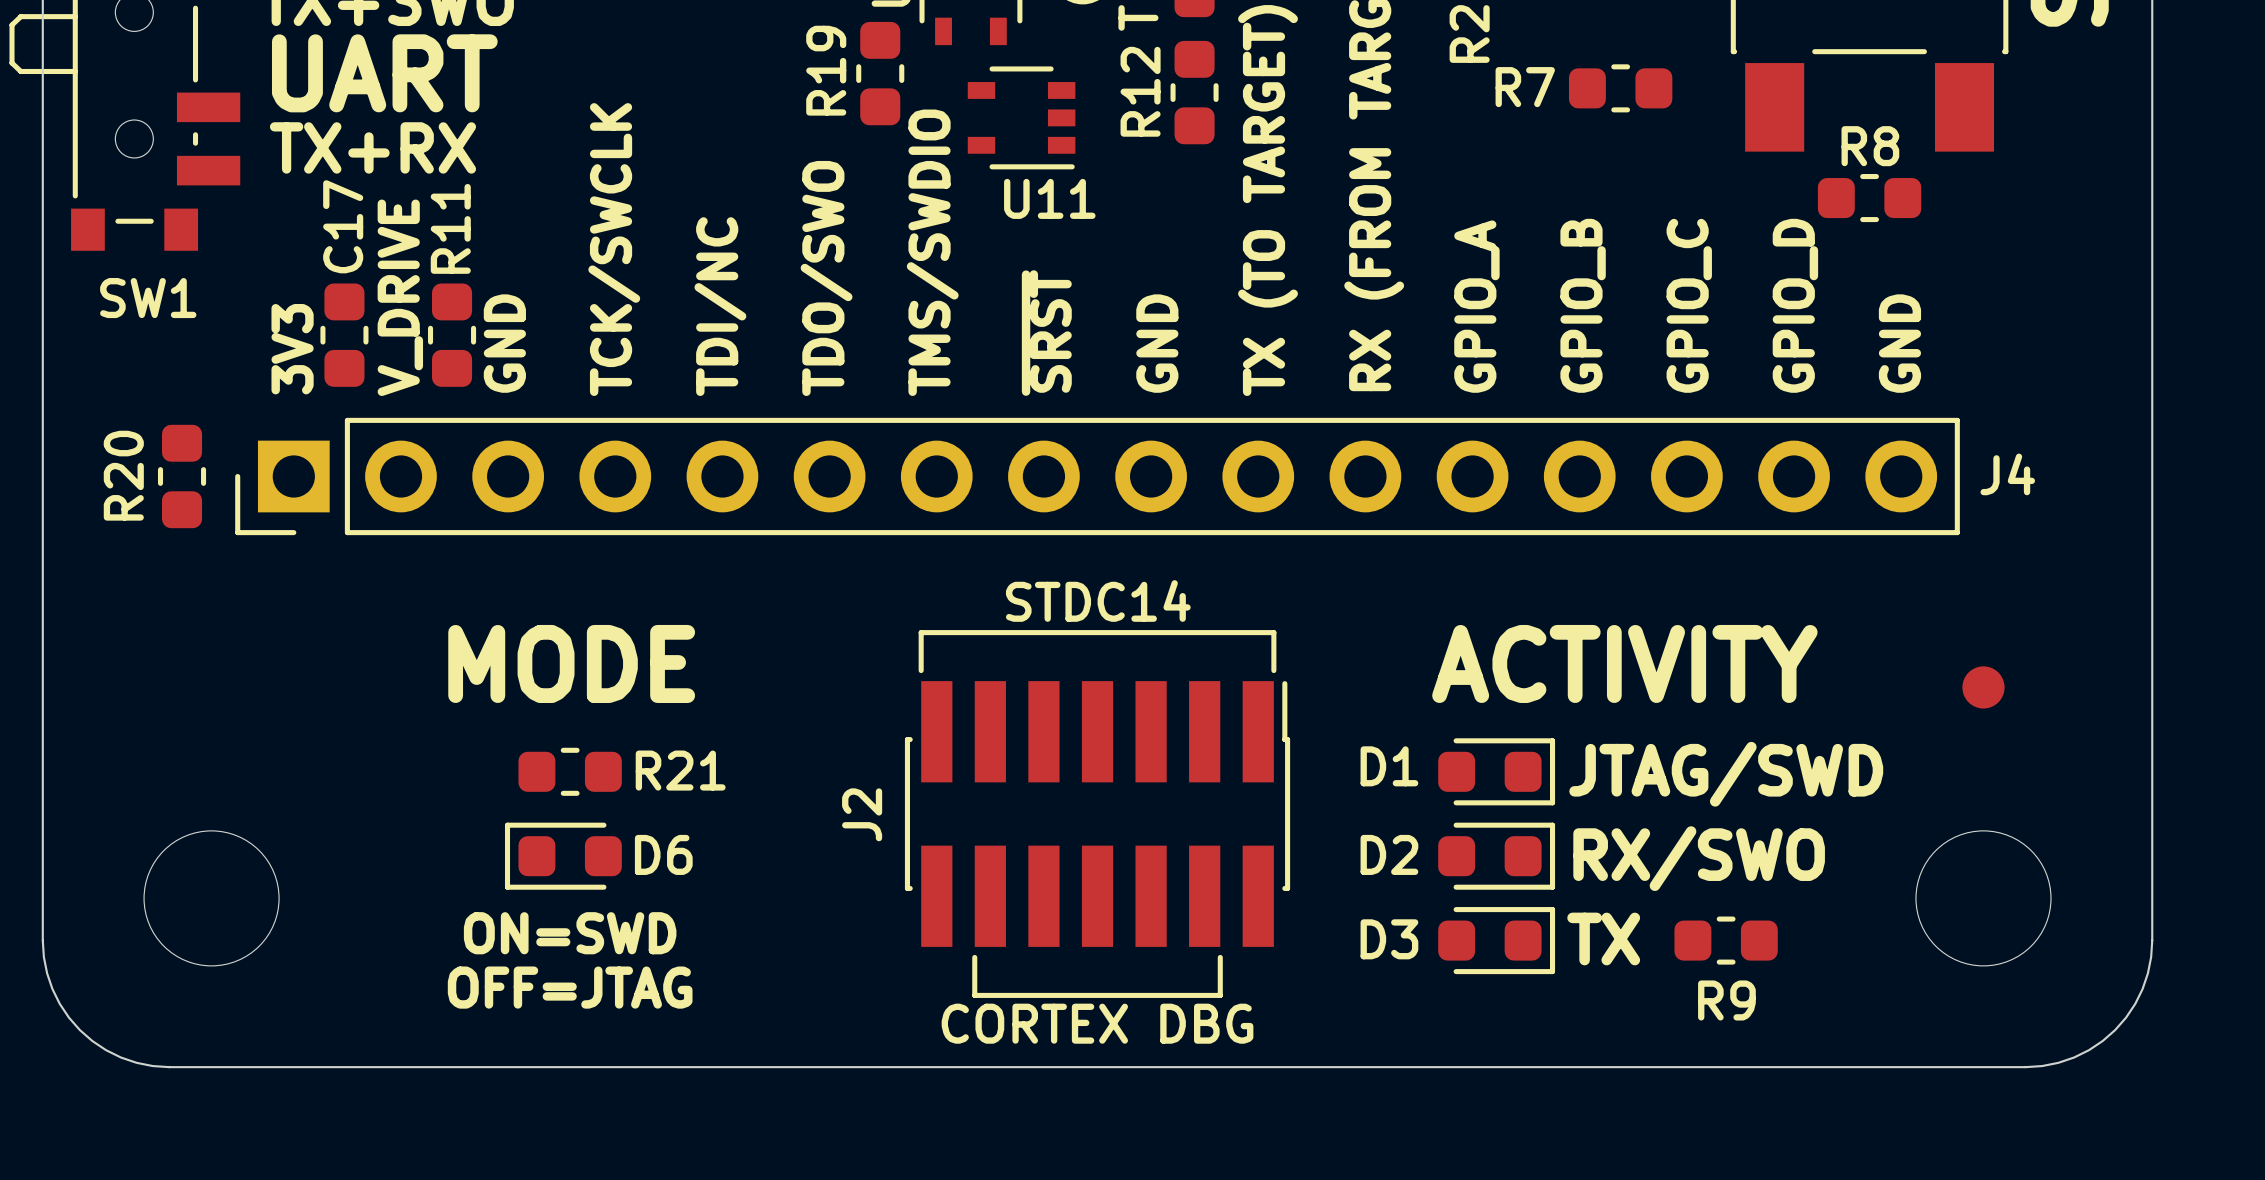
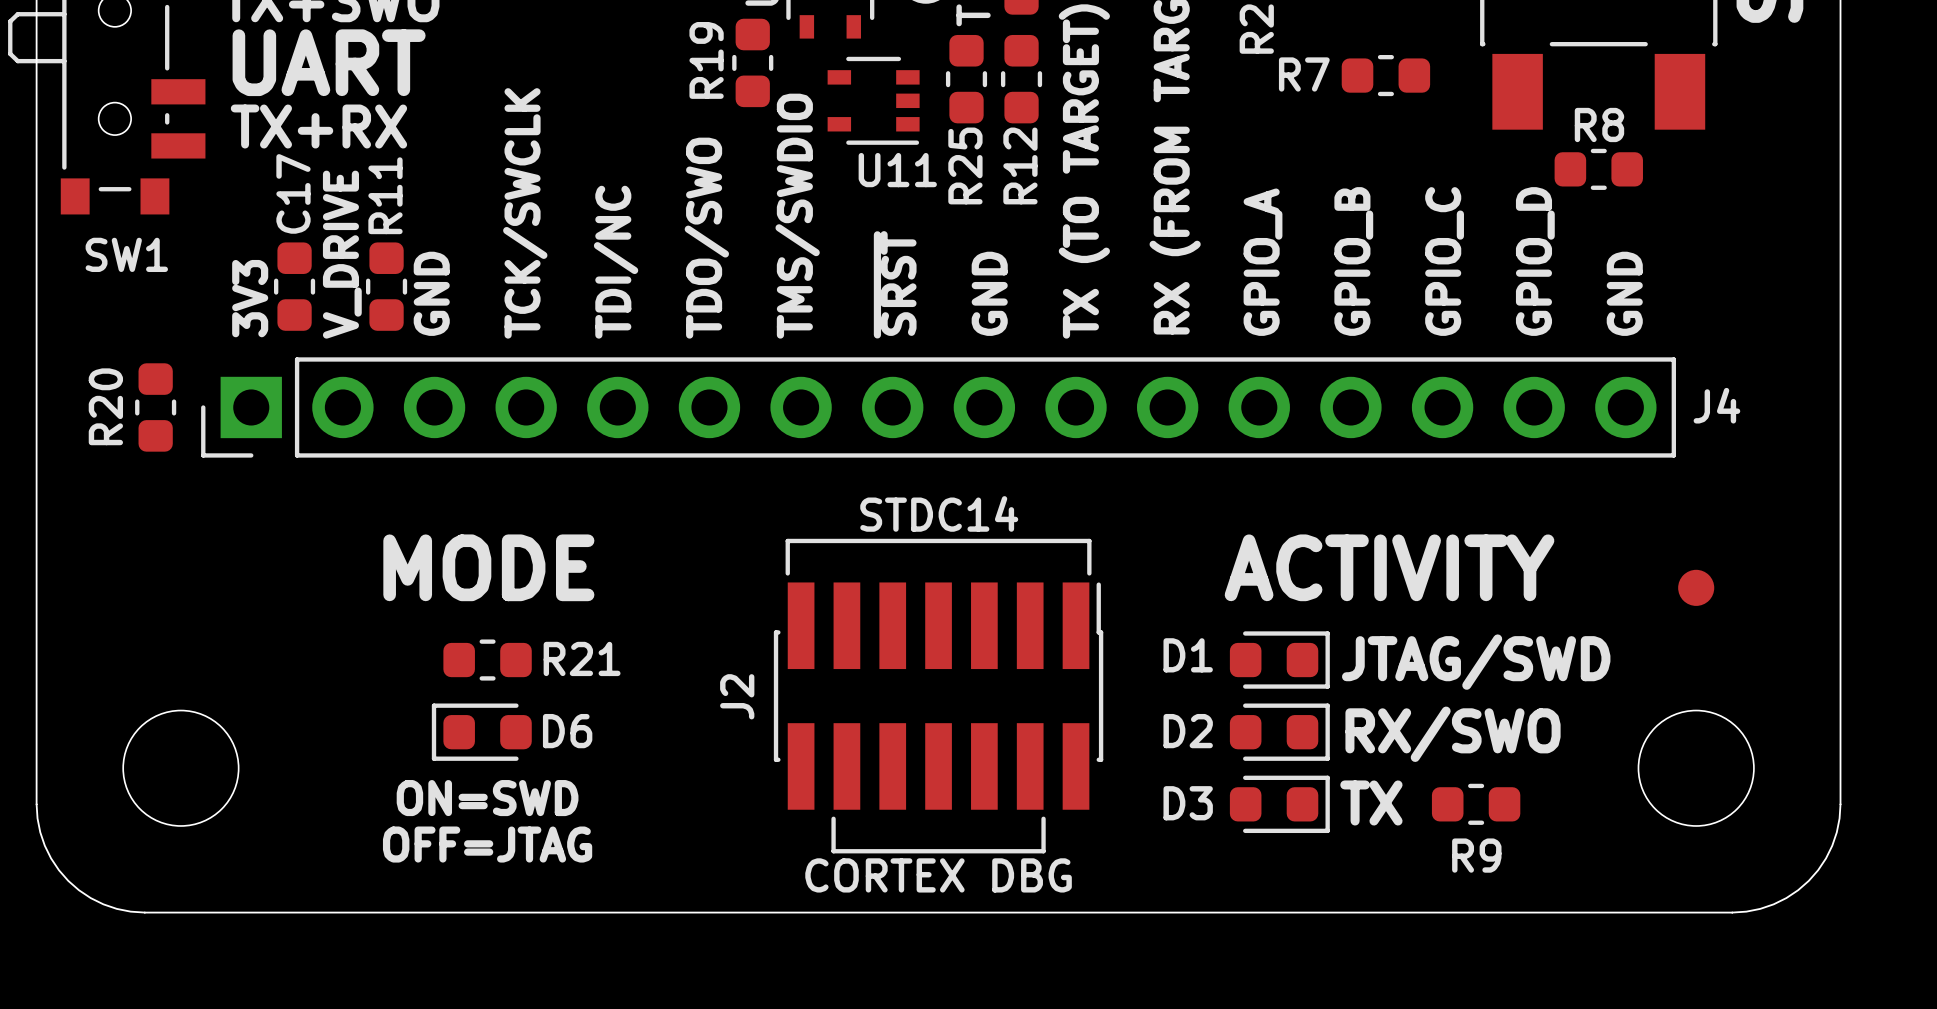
R12 name position: R12 (1140, 91) -> R12 (1020, 165)
R25: none -> (966, 79)

